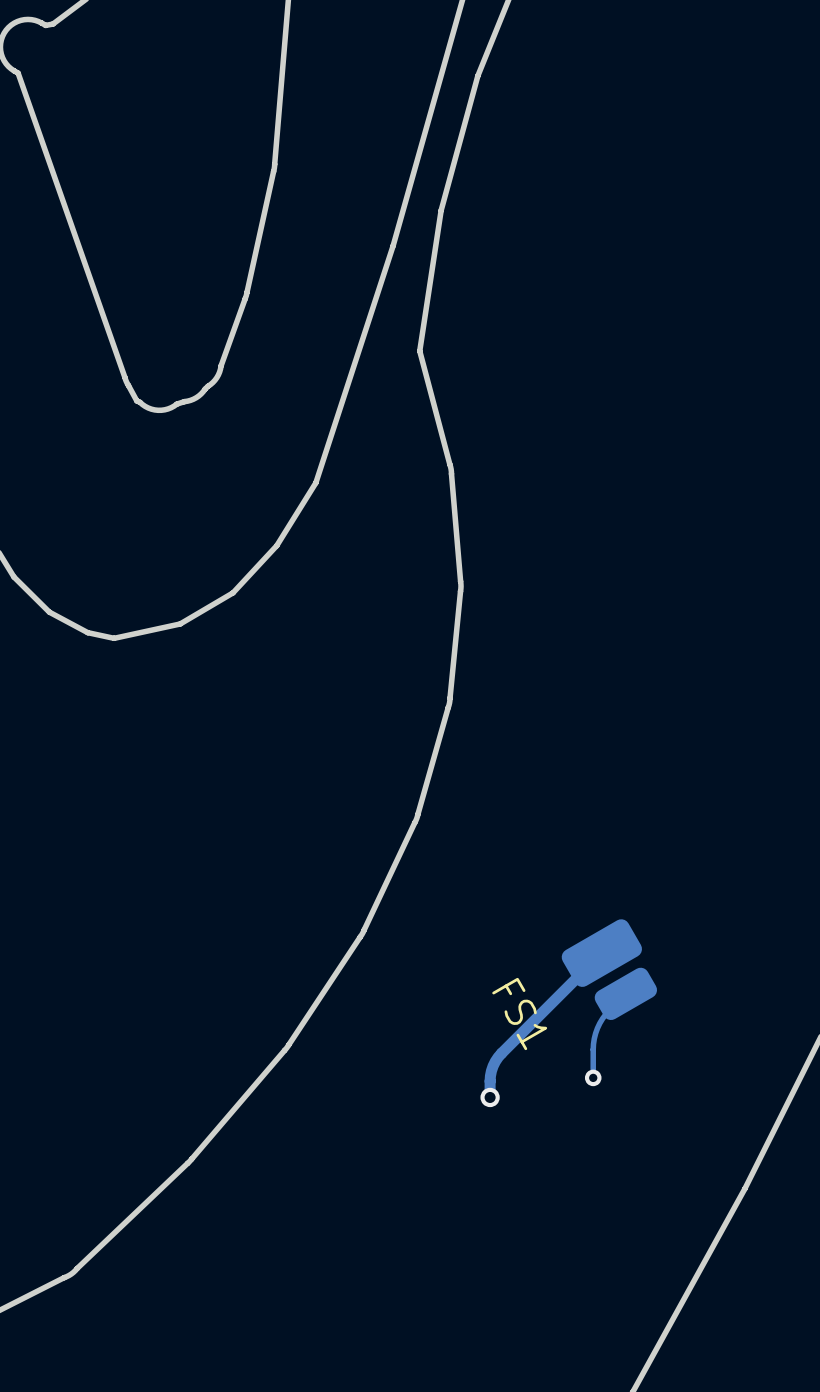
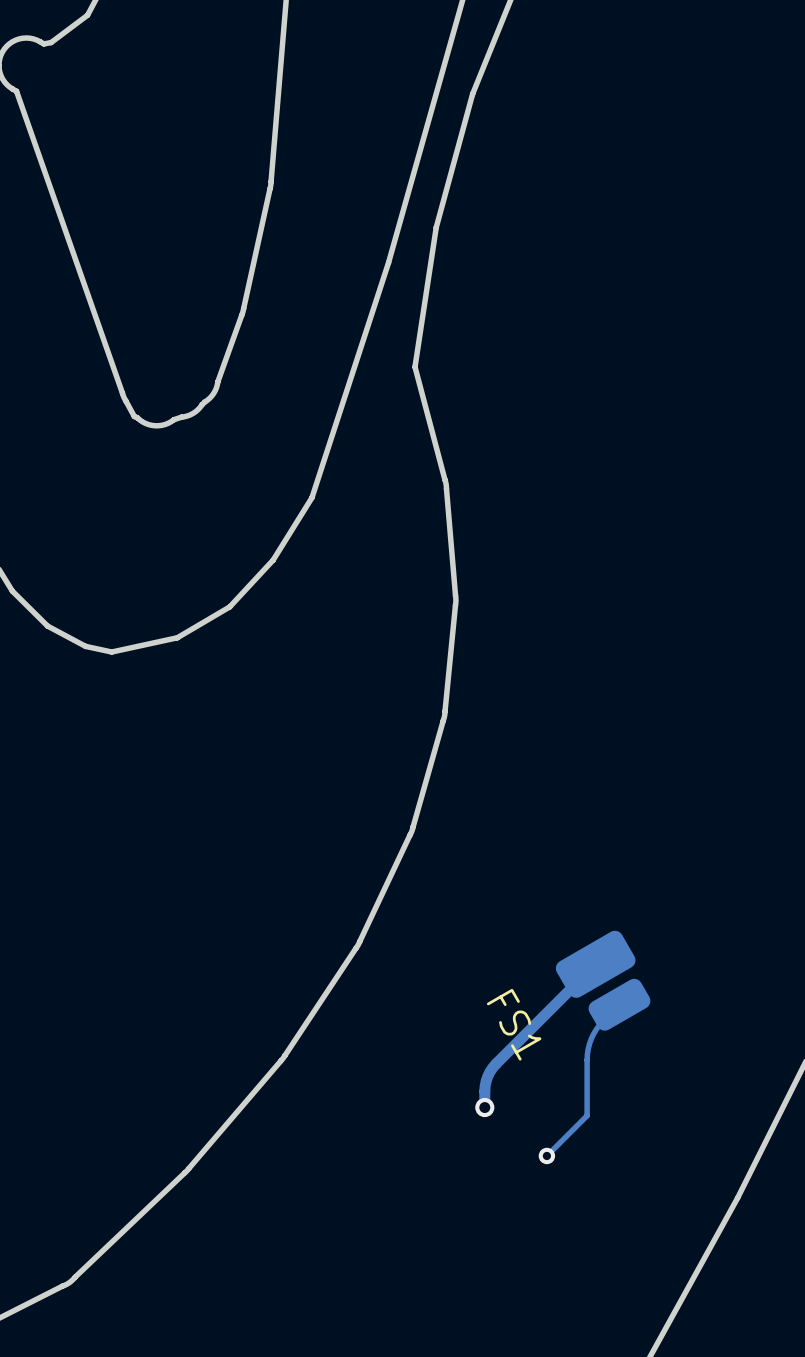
track: none -> (587, 1088) (587, 1115) (546, 1155)
via position: (593, 1077) -> (546, 1155)

